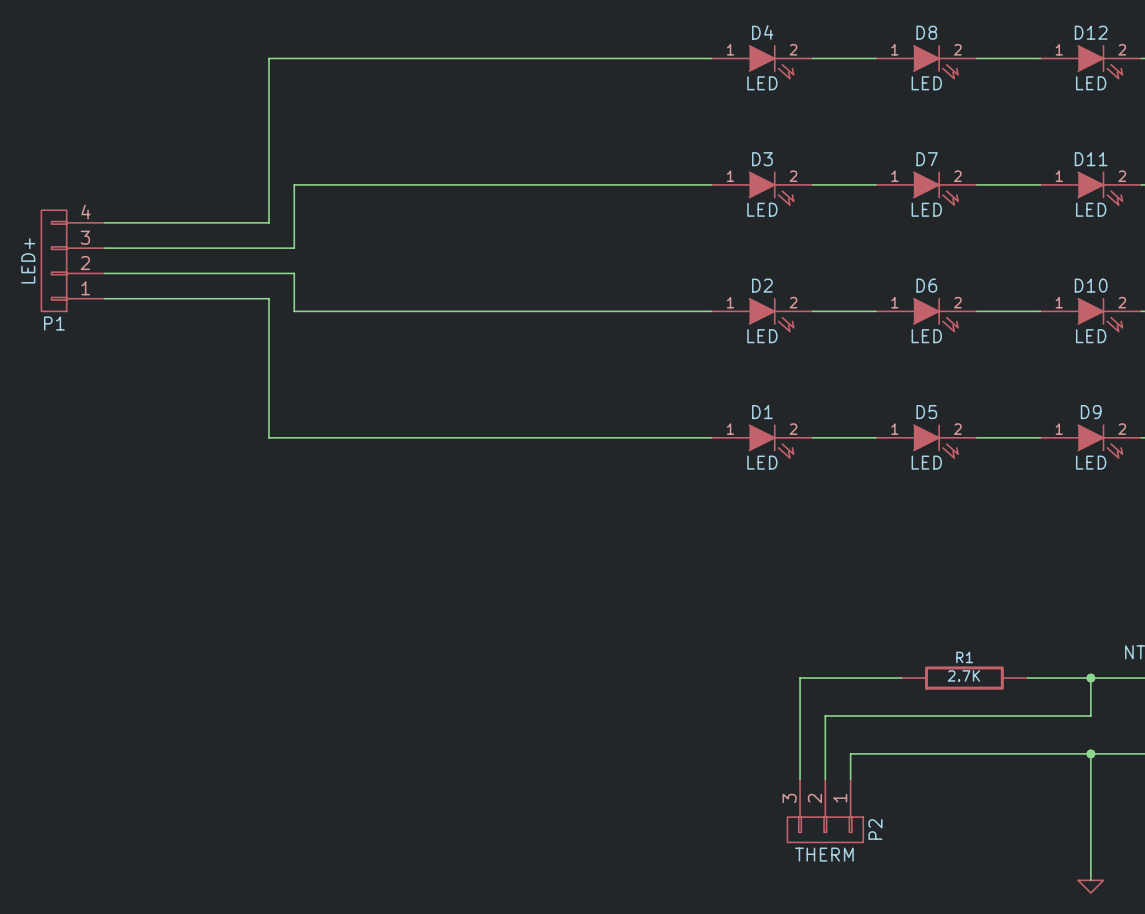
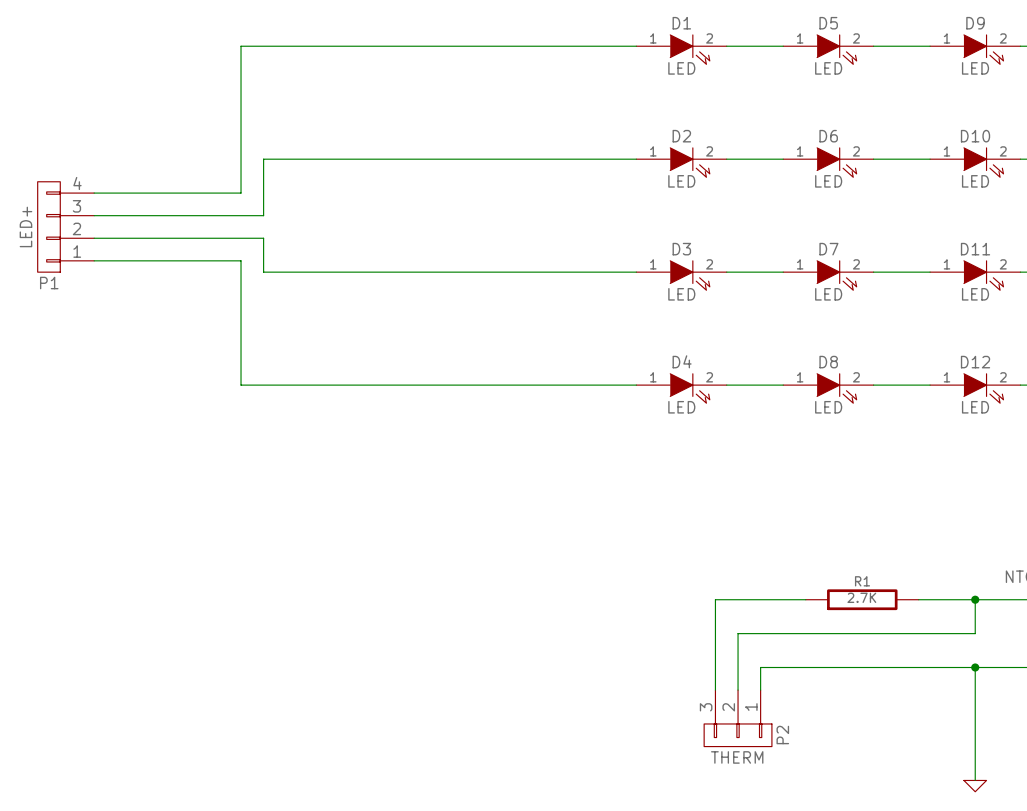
D4 name: D4 (762, 32) -> D1 (681, 23)
D8 name: D8 (926, 32) -> D5 (828, 23)
D12 name: D12 (1091, 32) -> D9 (975, 23)
D3 name: D3 (762, 159) -> D2 (681, 136)
D7 name: D7 (927, 159) -> D6 (828, 136)
D11 name: D11 (1091, 159) -> D10 (975, 136)
D2 name: D2 (762, 285) -> D3 (681, 249)
D6 name: D6 (926, 285) -> D7 (828, 249)
D10 name: D10 (1091, 285) -> D11 (975, 249)
D1 name: D1 (762, 412) -> D4 (682, 361)
D5 name: D5 (926, 412) -> D8 (828, 362)
D9 name: D9 (1091, 412) -> D12 (975, 362)

